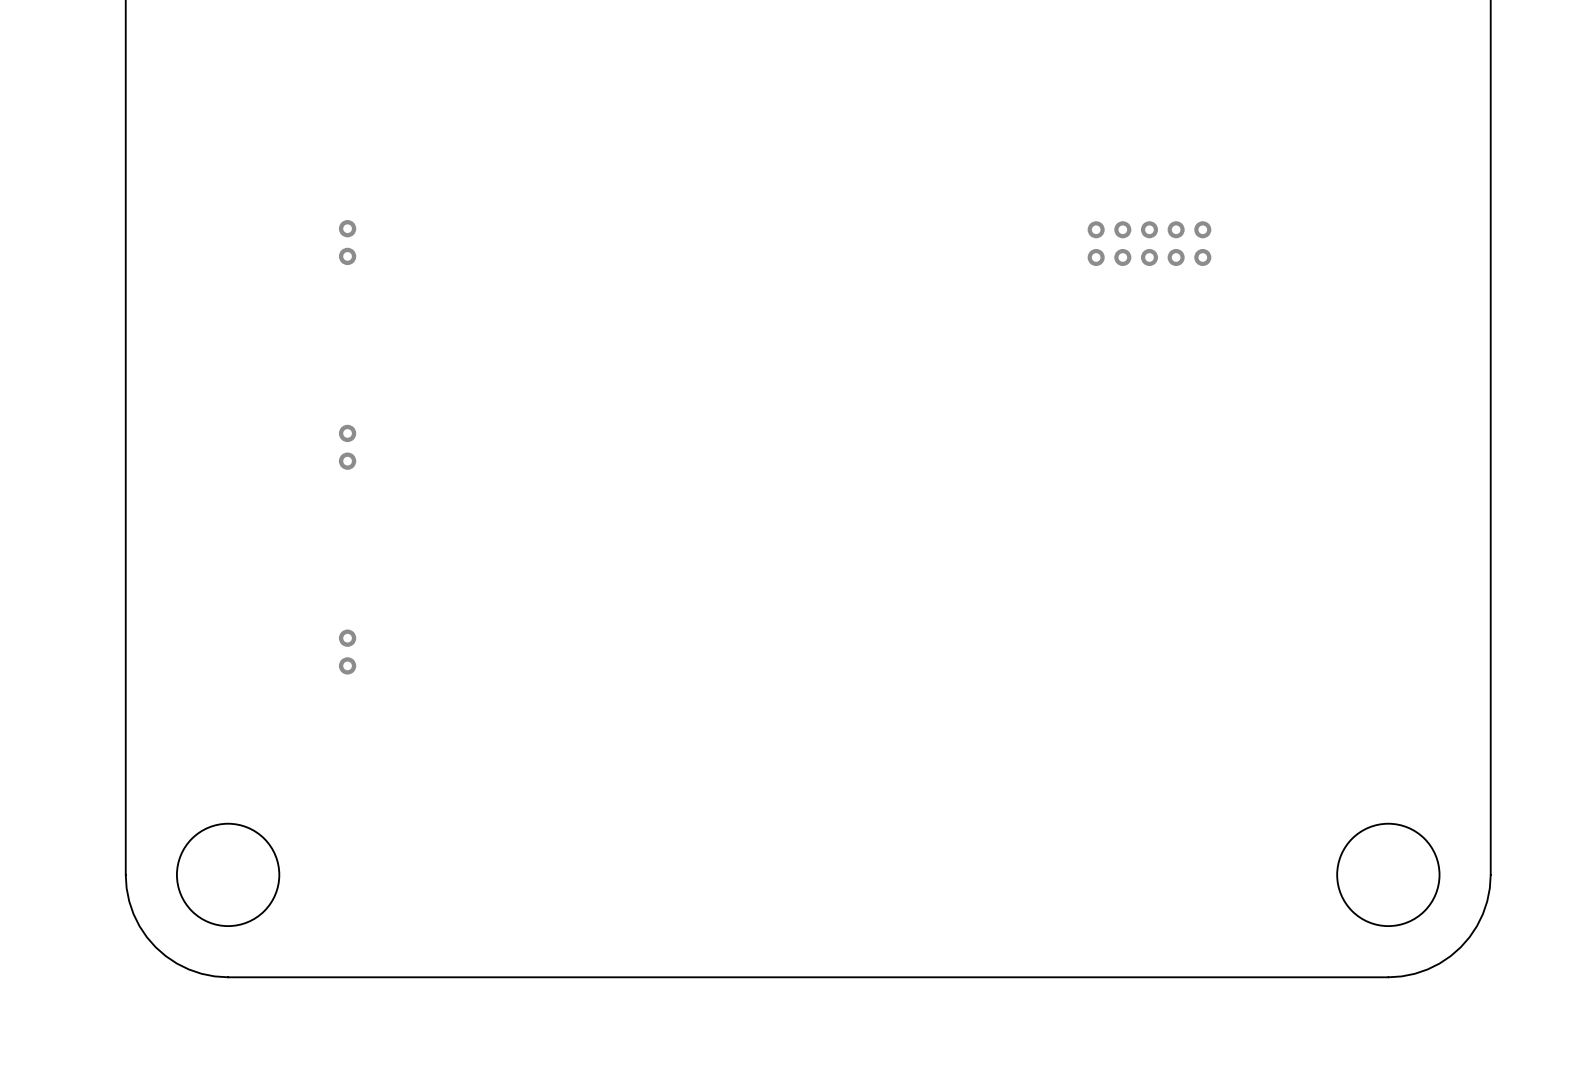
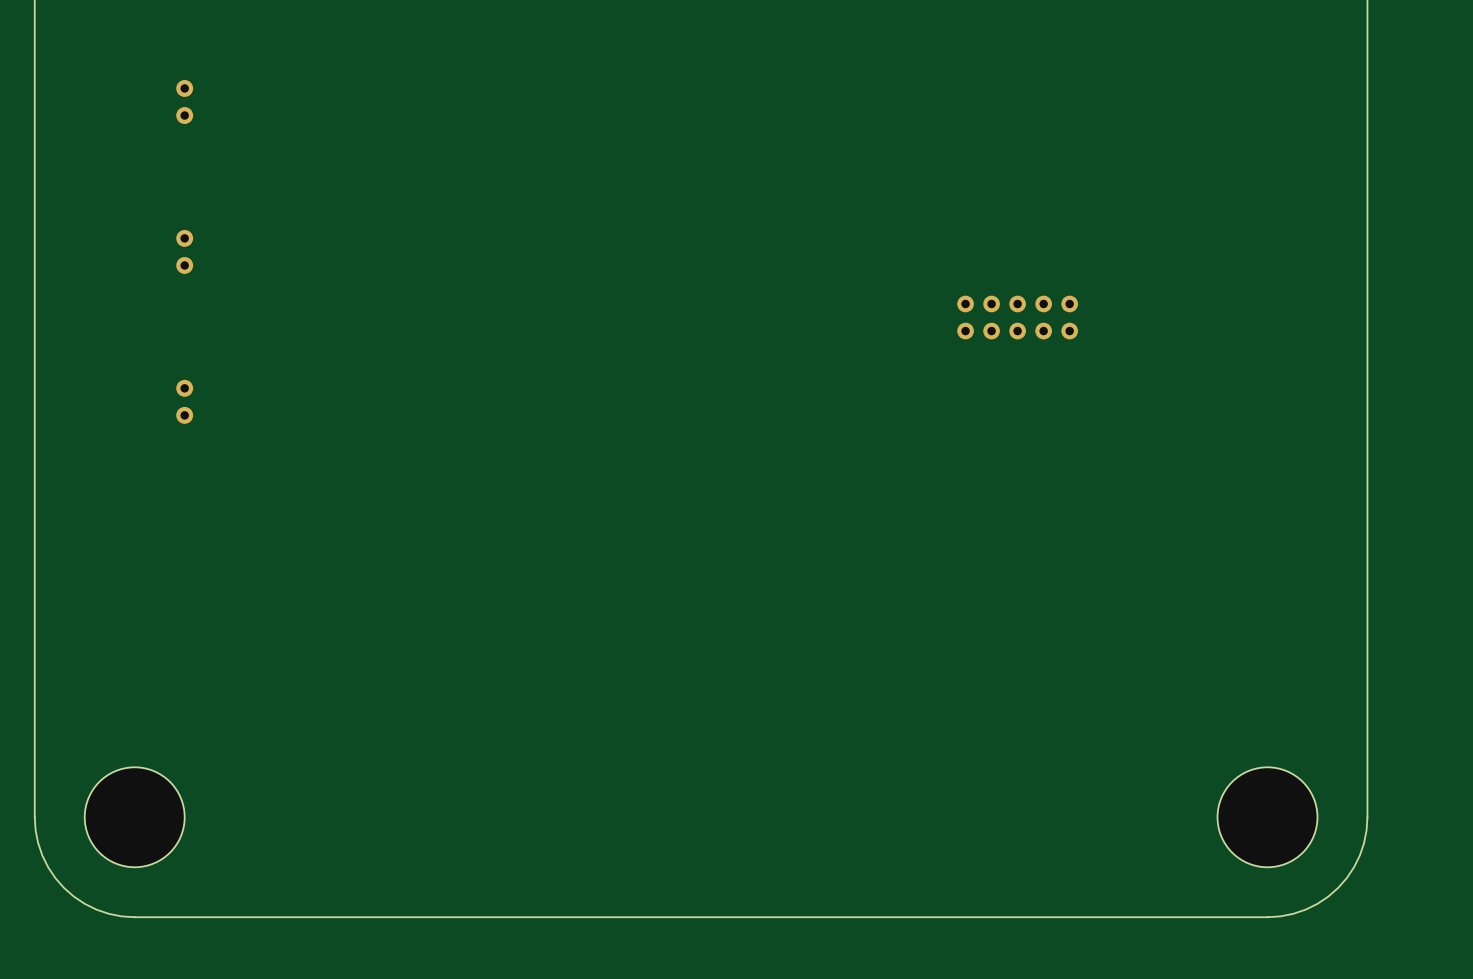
part: none -> (184, 101)
part: (347, 242) -> none
part position: (1149, 243) -> (1017, 317)
part: none -> (184, 251)
part position: (347, 447) -> (184, 401)
part: (347, 652) -> none

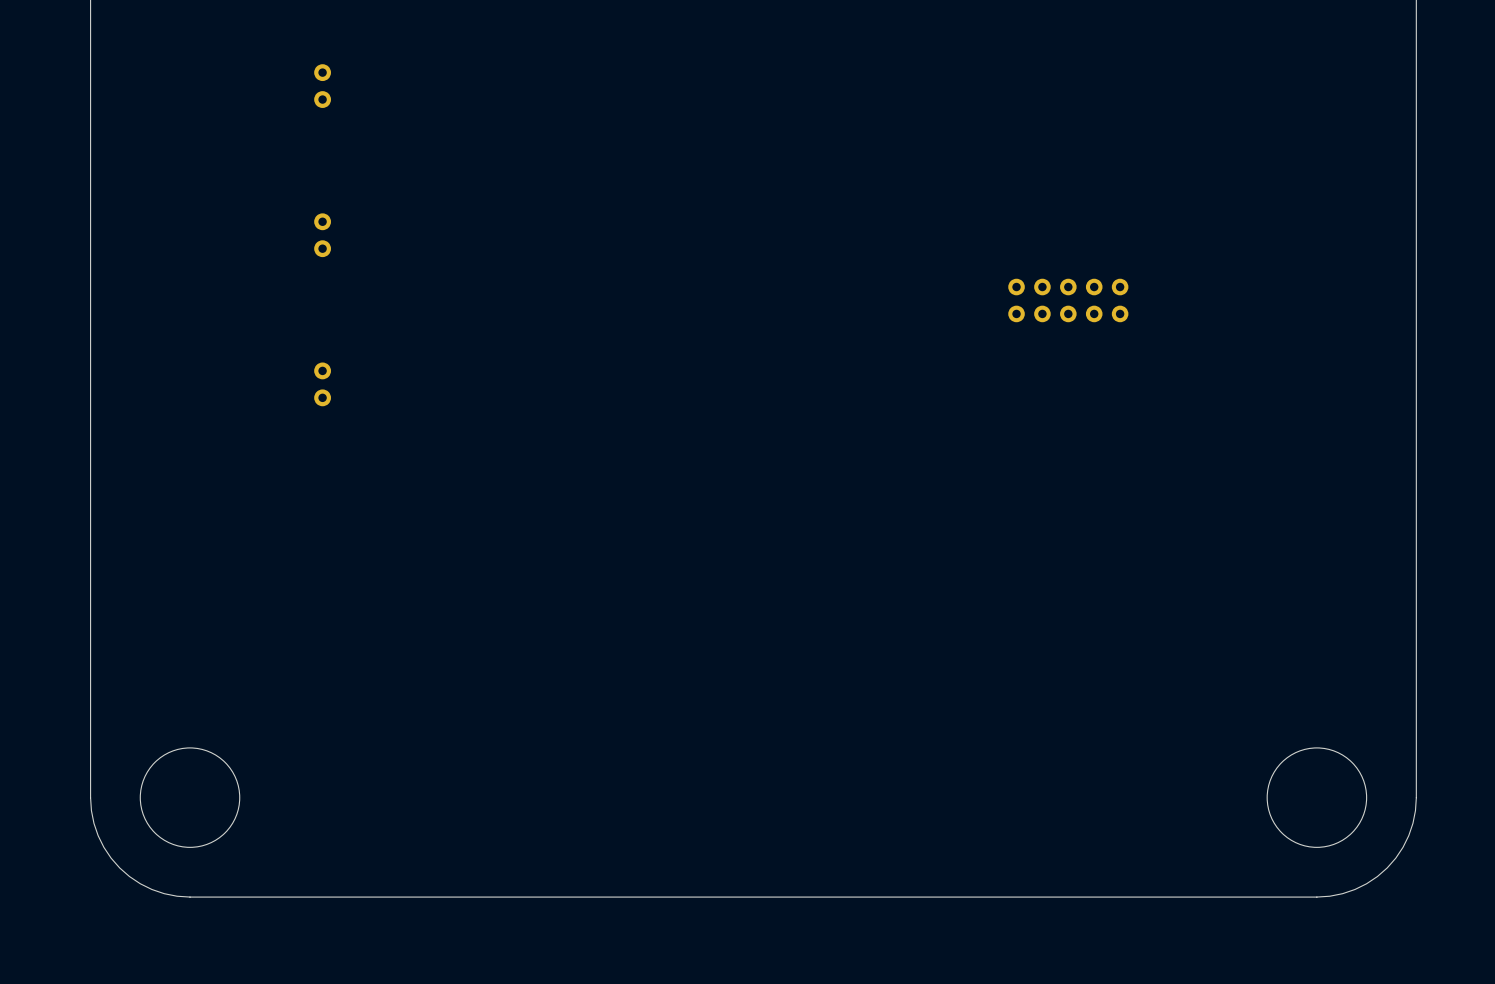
part position: (184, 101) -> (322, 86)
part position: (184, 251) -> (322, 235)
part position: (184, 401) -> (322, 384)

